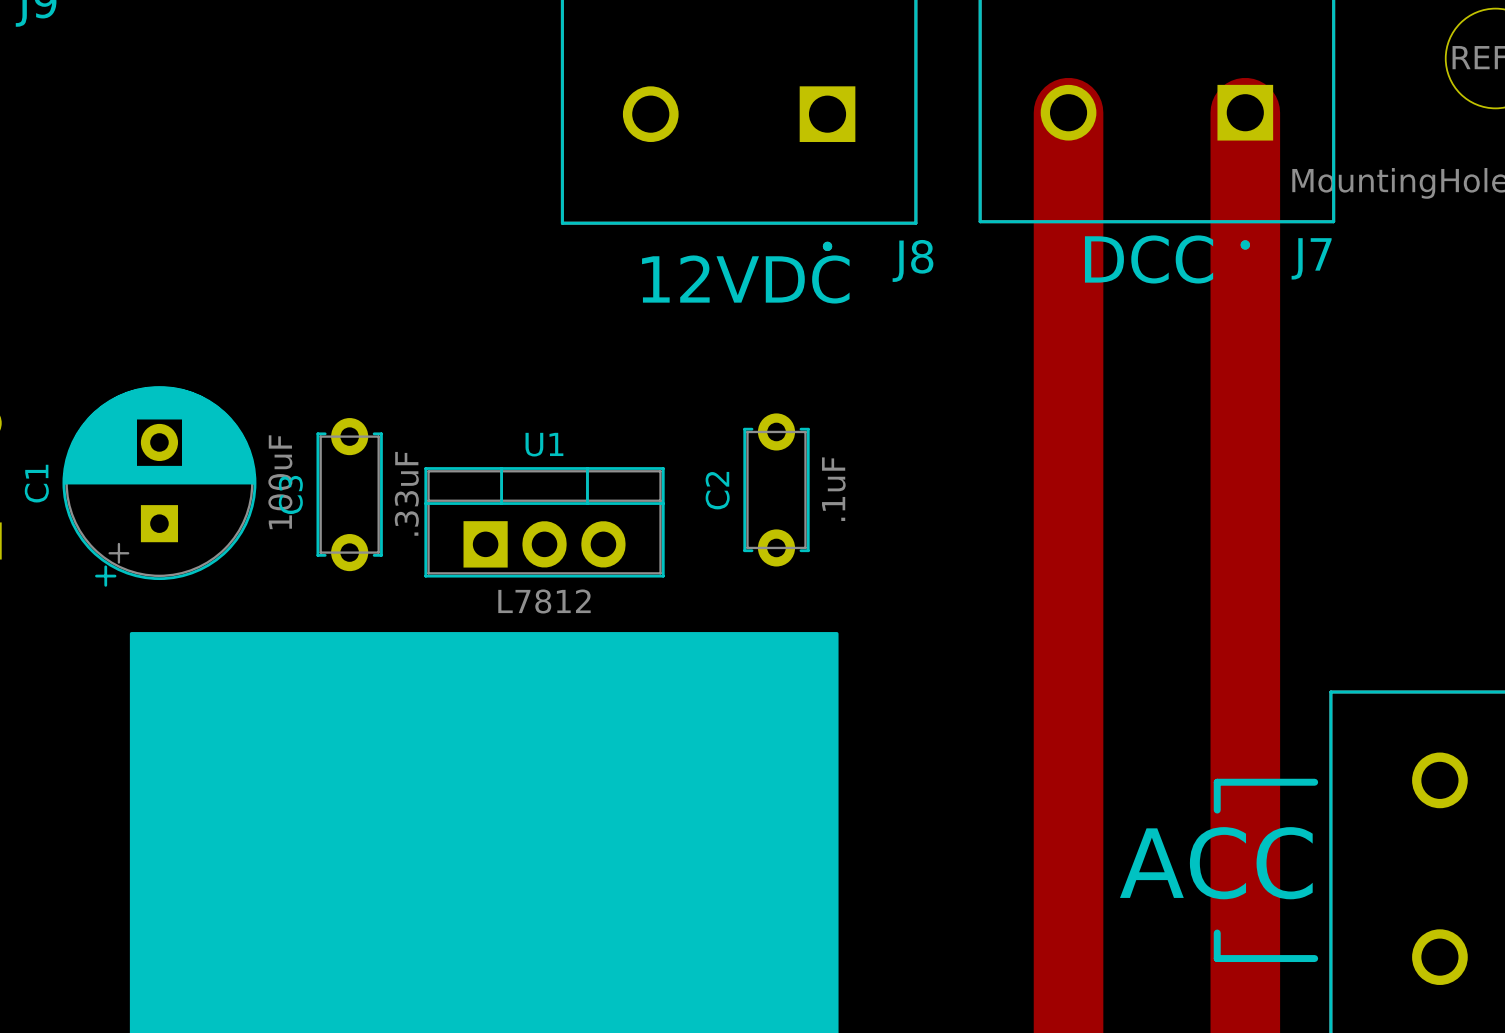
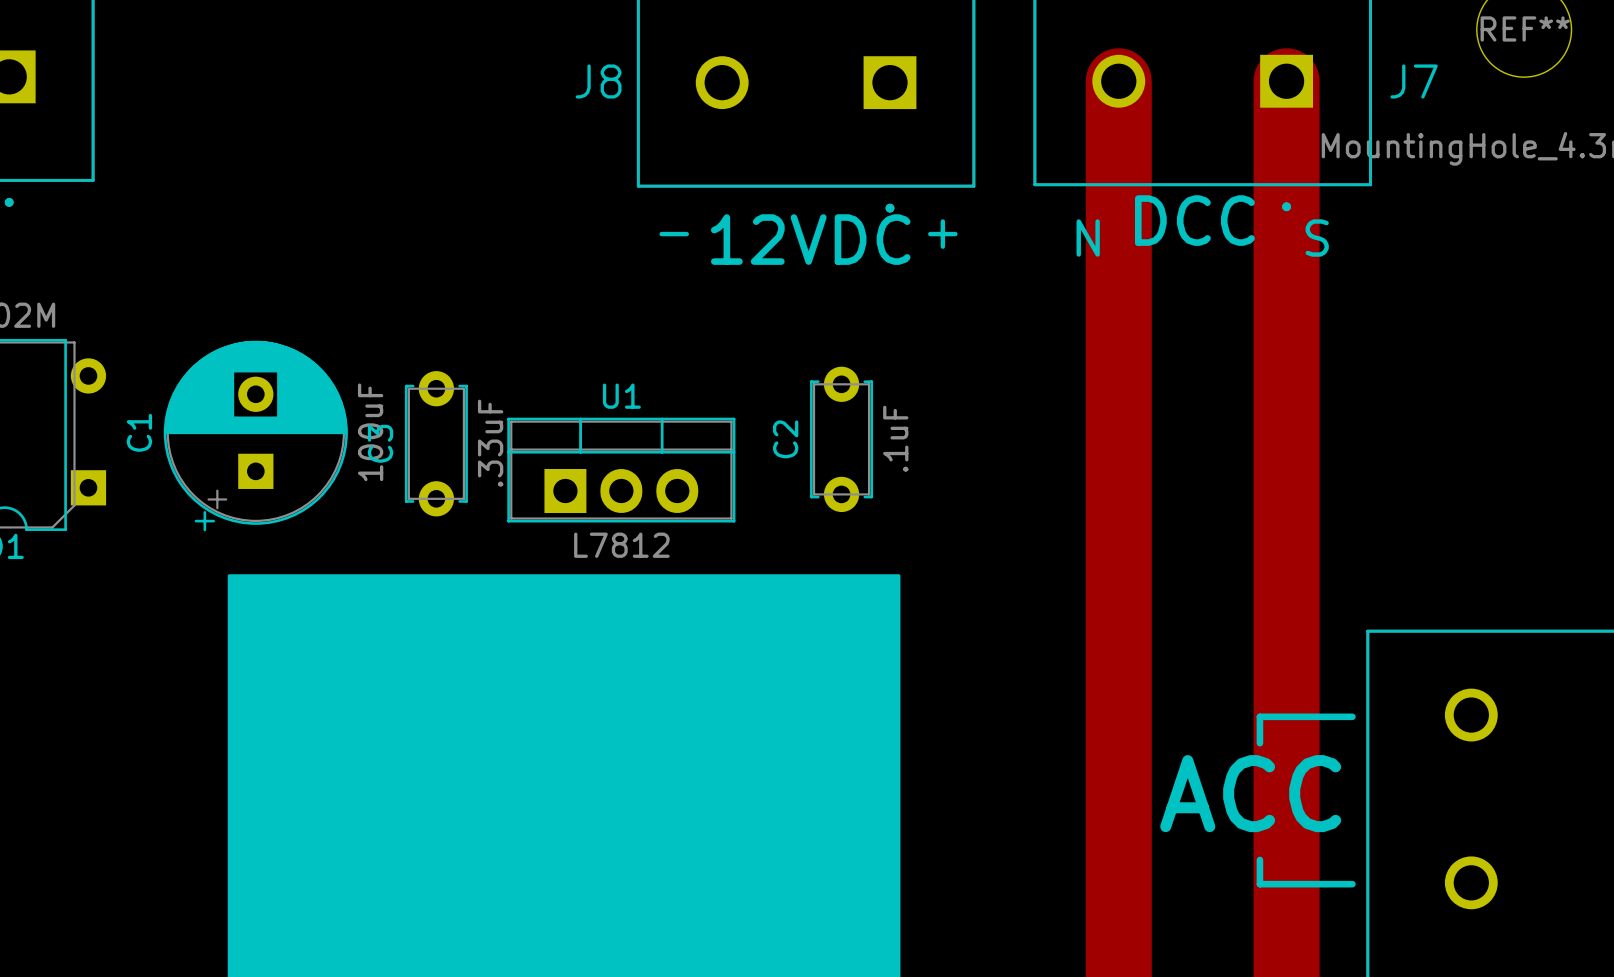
J7 name position: J7 (1311, 258) -> J7 (1414, 81)
J8 name position: J8 (913, 260) -> J8 (598, 81)
J8 text: none -> - (674, 234)
J8 text: none -> + (942, 234)
J7 text: none -> N (1088, 238)
J7 text: none -> S (1317, 238)

